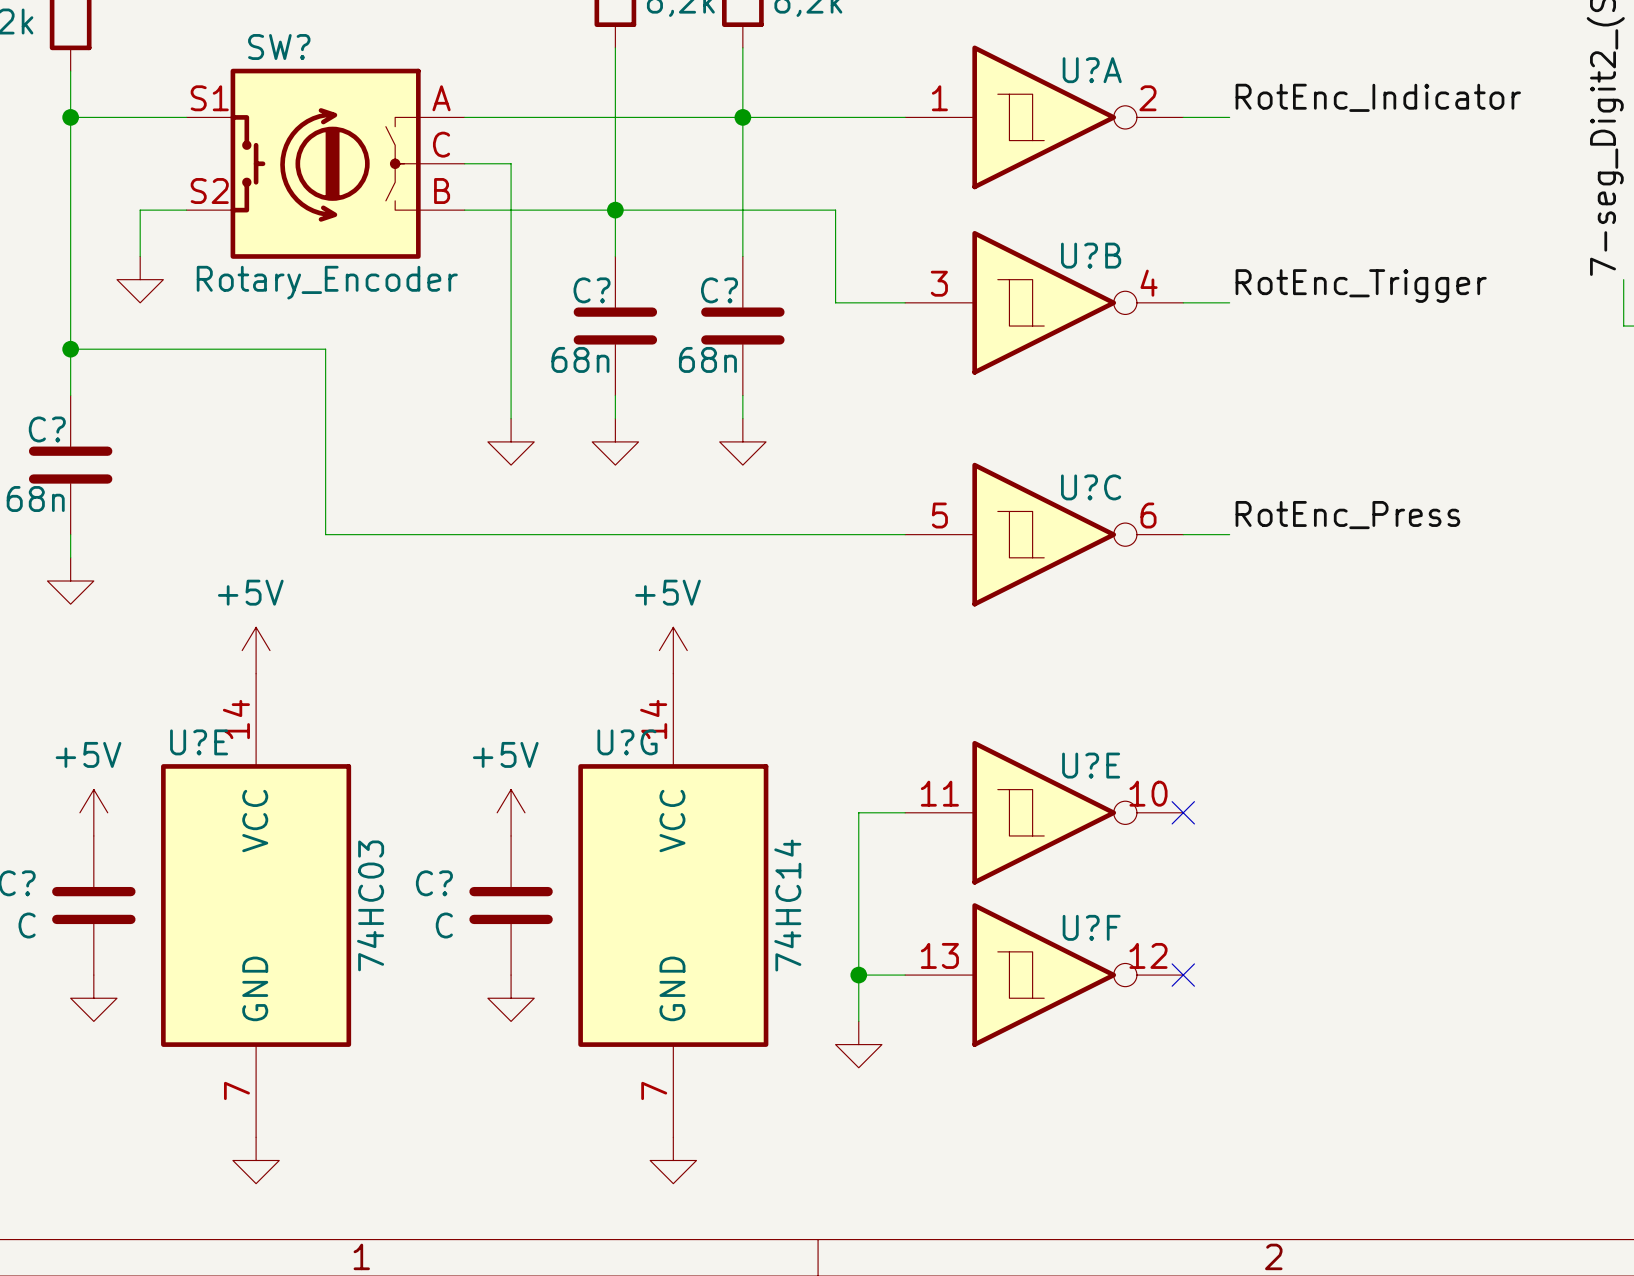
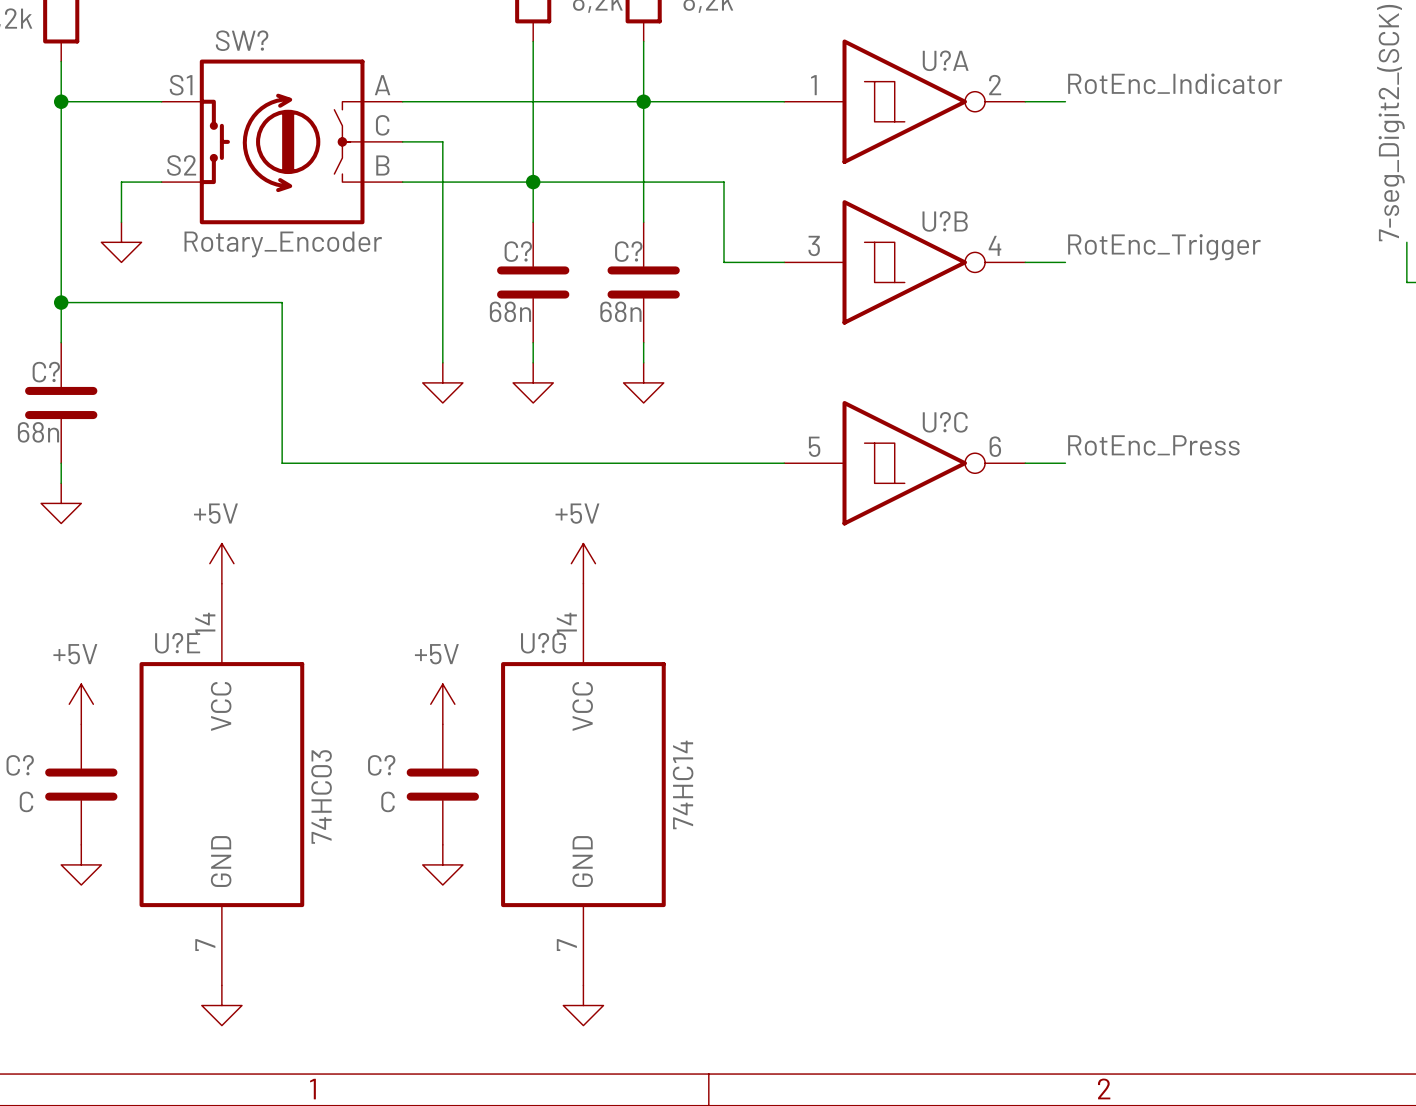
wire: (905, 812) (858, 812) (858, 1021) -> none
U?E: (1044, 812) -> none
no-connect mark: (1183, 812) -> none
wire: (858, 975) (905, 975) -> none
junction: (858, 975) -> none
U?F: (1044, 975) -> none
no-connect mark: (1183, 975) -> none
power symbol: (858, 1044) -> none

